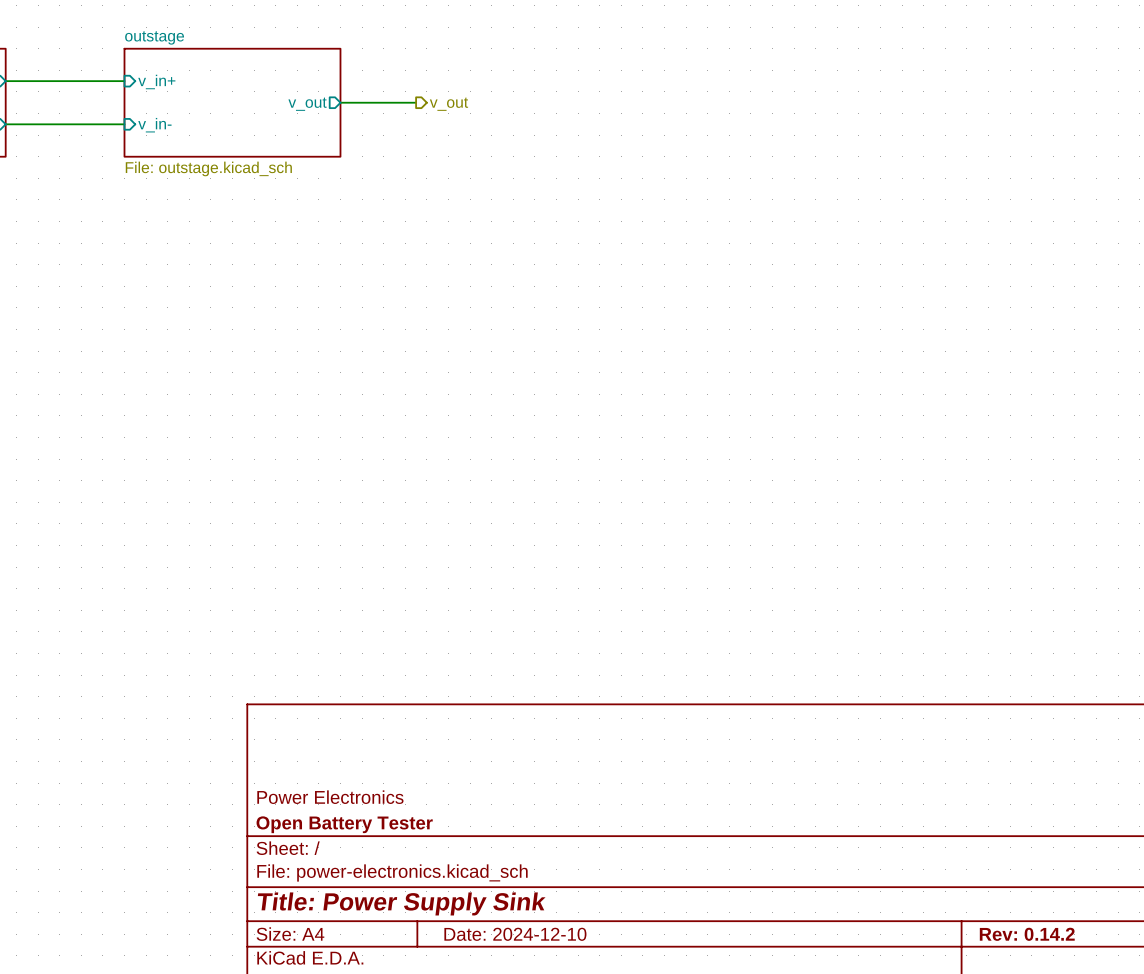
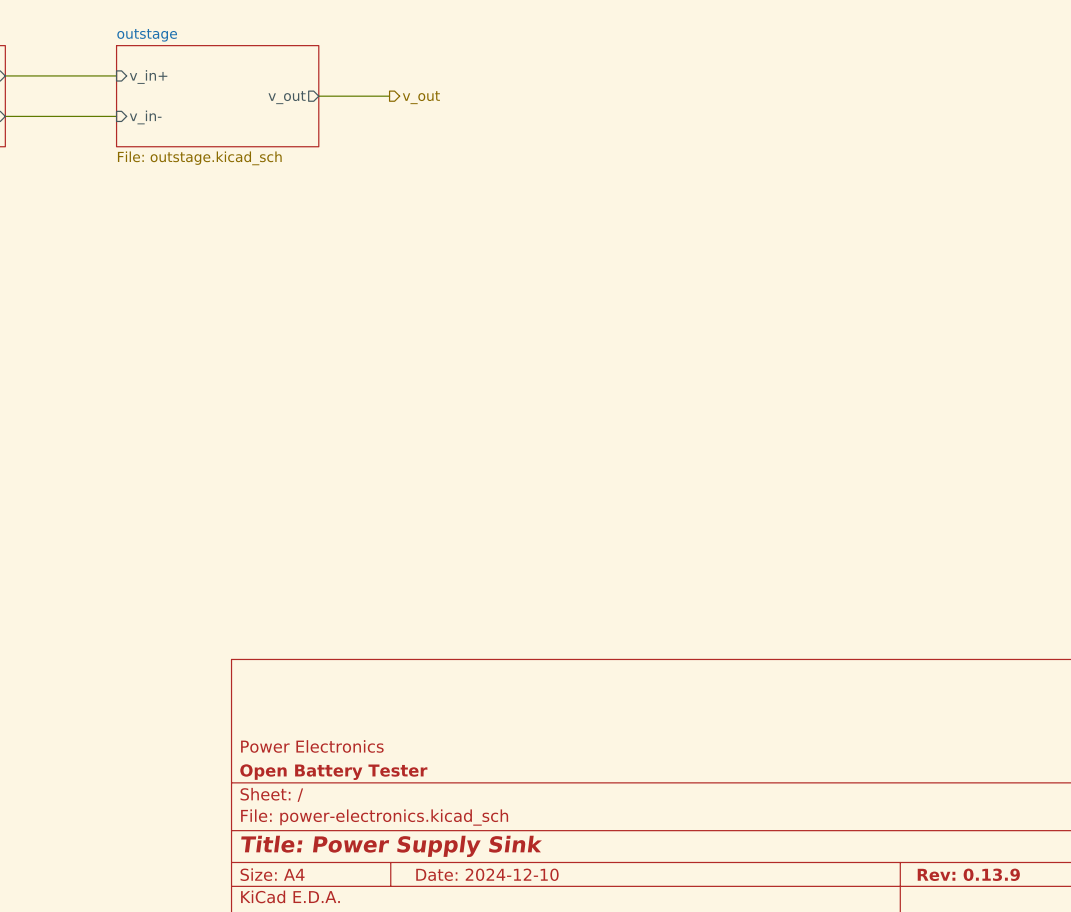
title block: Rev: 0.14.2 (1027, 934) -> Rev: 0.13.9 (968, 874)

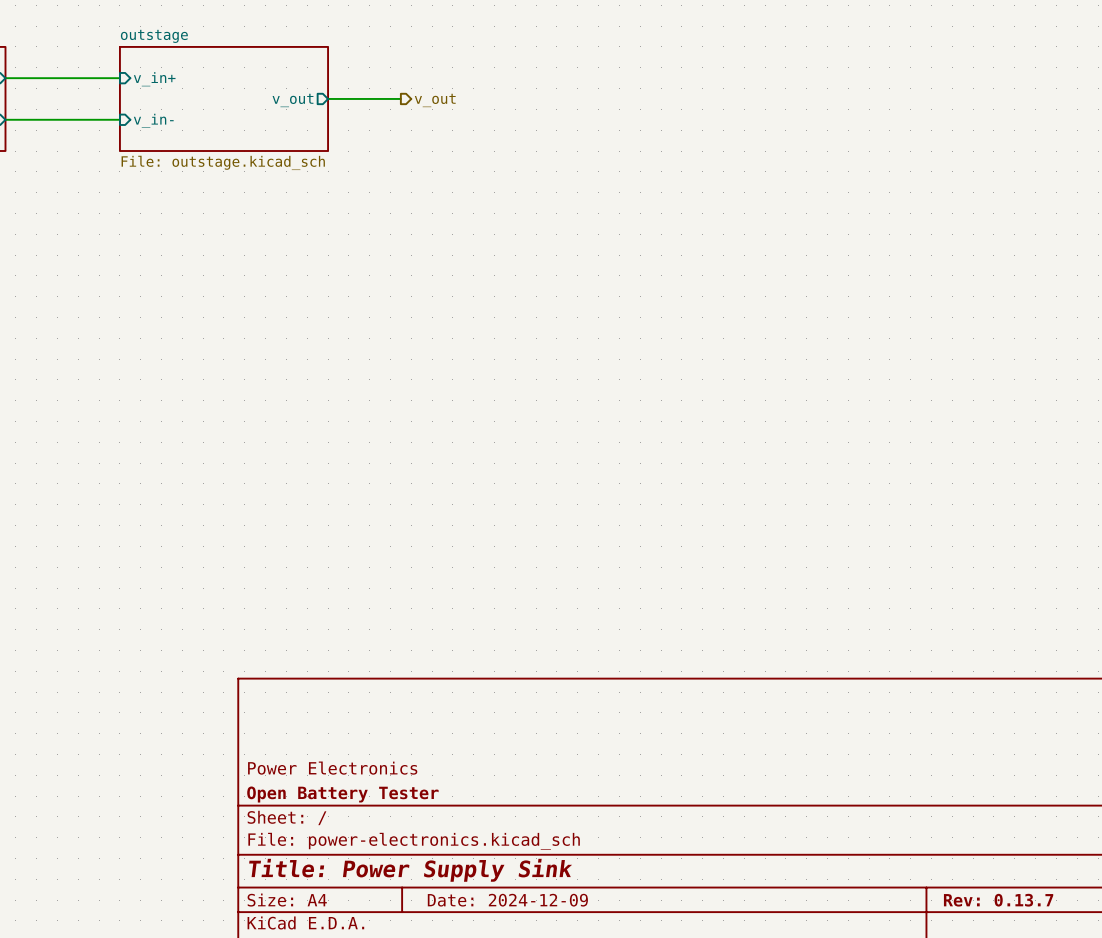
title block: Date: 2024-12-10 (487, 874) -> Date: 2024-12-09 (507, 900)
title block: Rev: 0.13.9 (968, 874) -> Rev: 0.13.7 (998, 900)

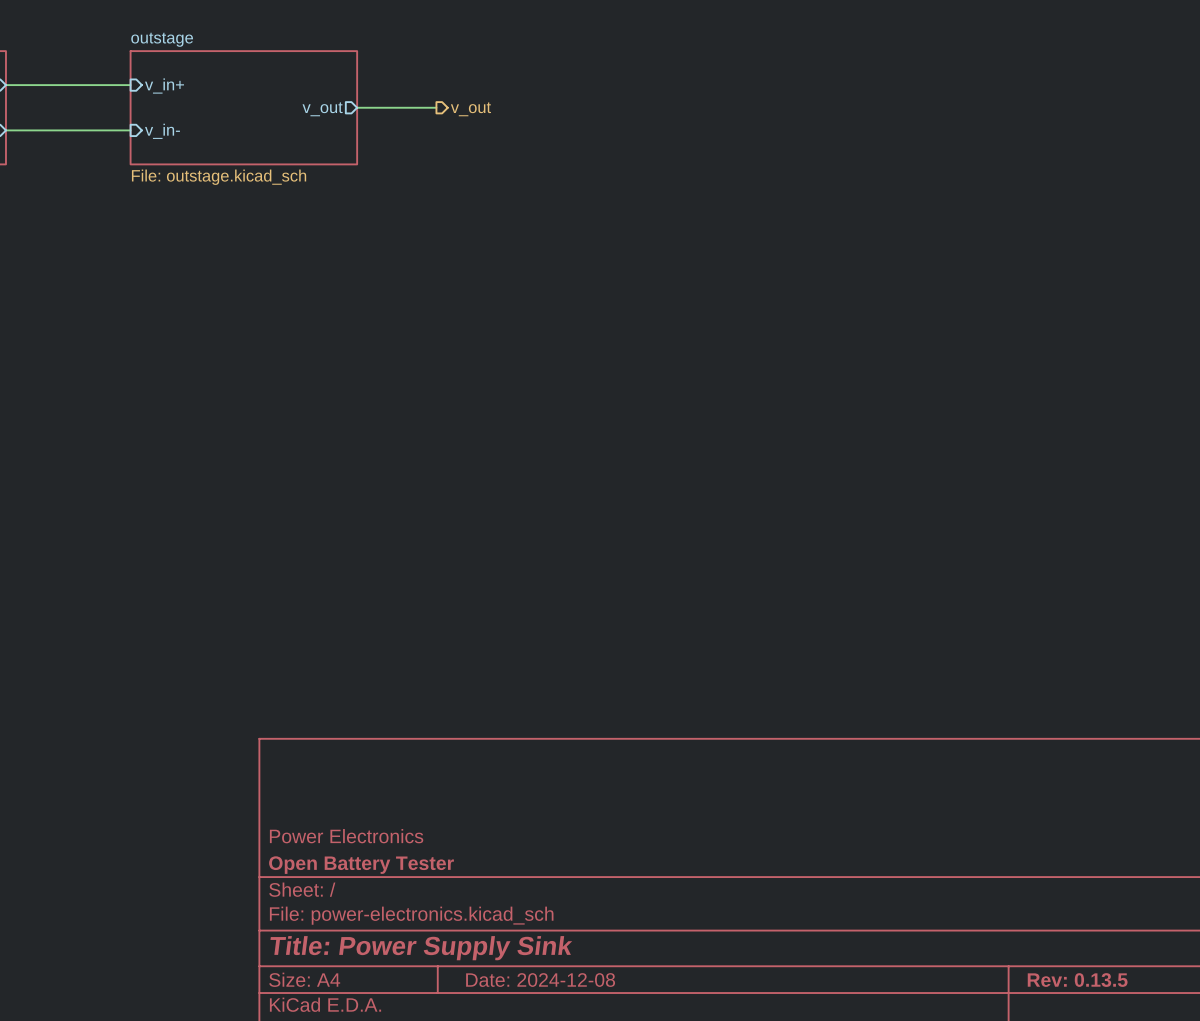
title block: Date: 2024-12-09 (507, 900) -> Date: 2024-12-08 (540, 980)
title block: Rev: 0.13.7 (998, 900) -> Rev: 0.13.5 (1077, 980)

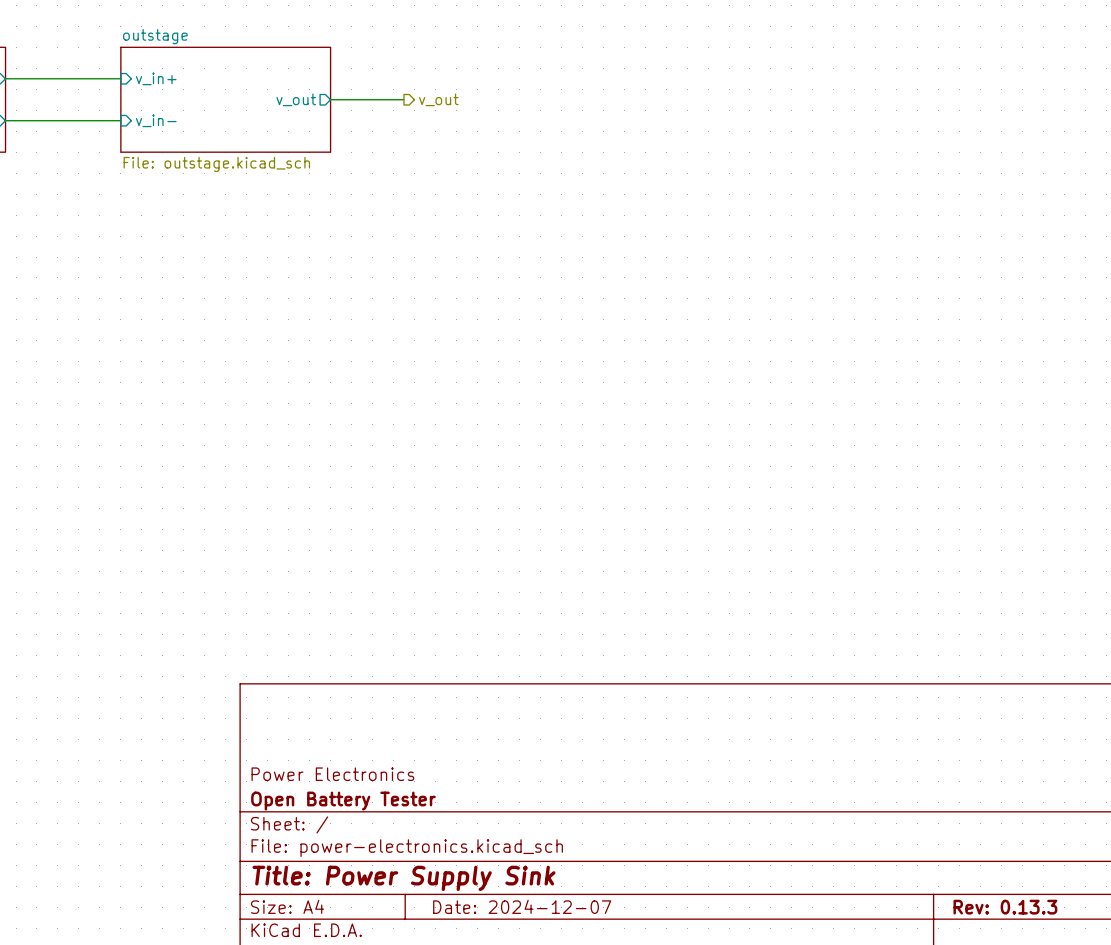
title block: Date: 2024-12-08 (540, 980) -> Date: 2024-12-07 (522, 906)
title block: Rev: 0.13.5 (1077, 980) -> Rev: 0.13.3 (1005, 907)

